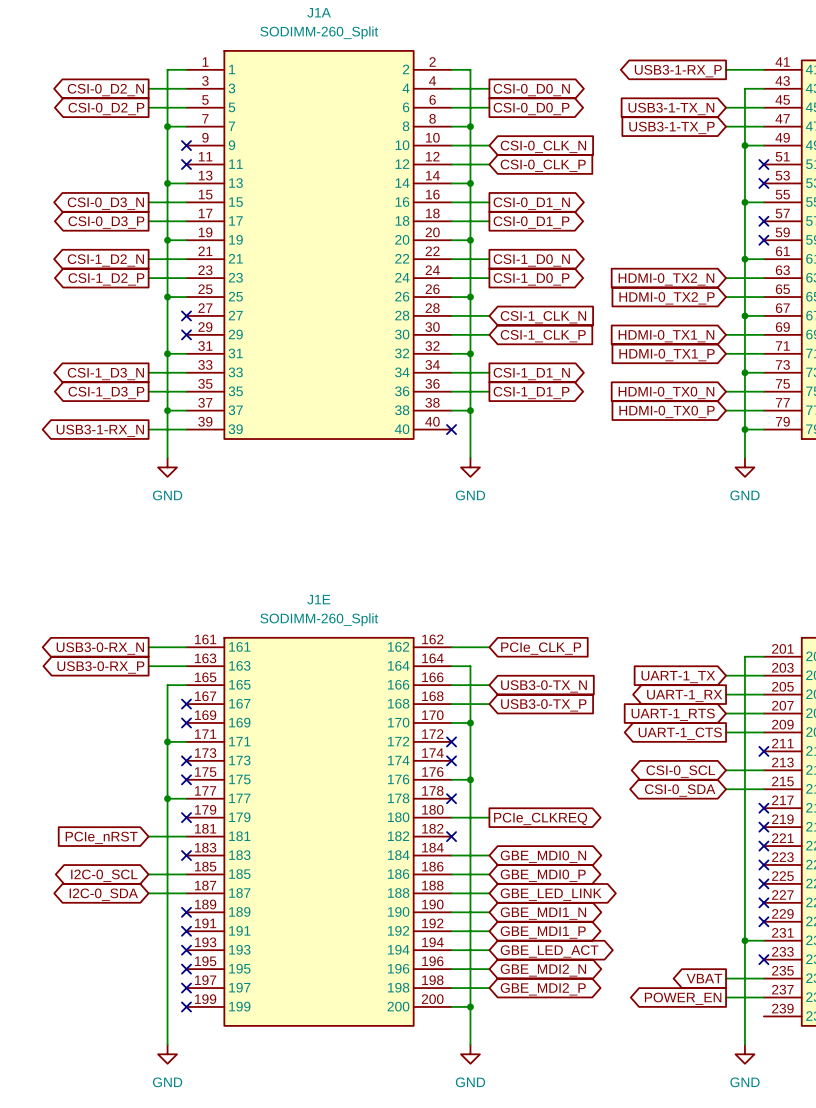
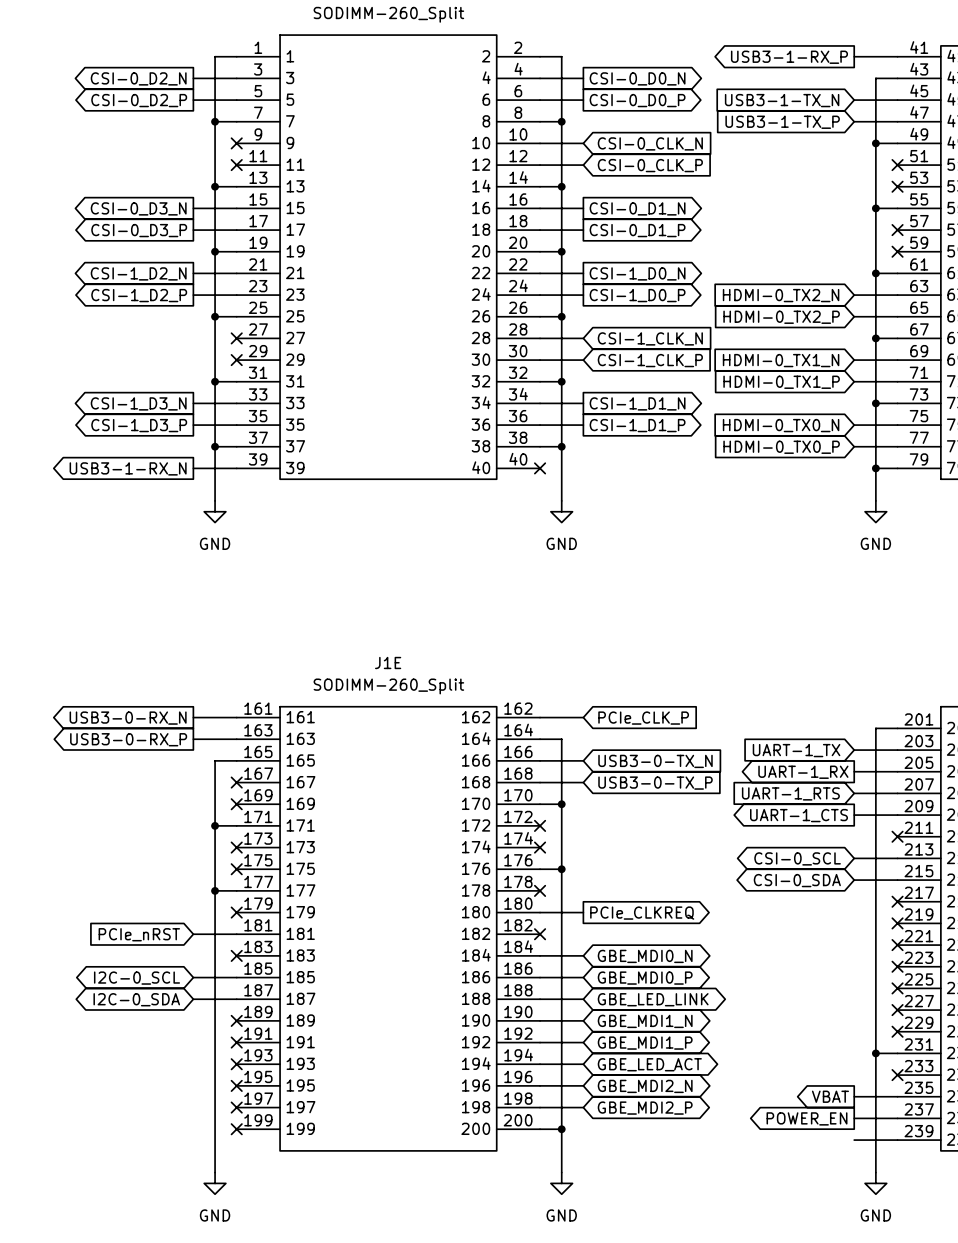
wire: none -> (854, 1140) (897, 1140)

